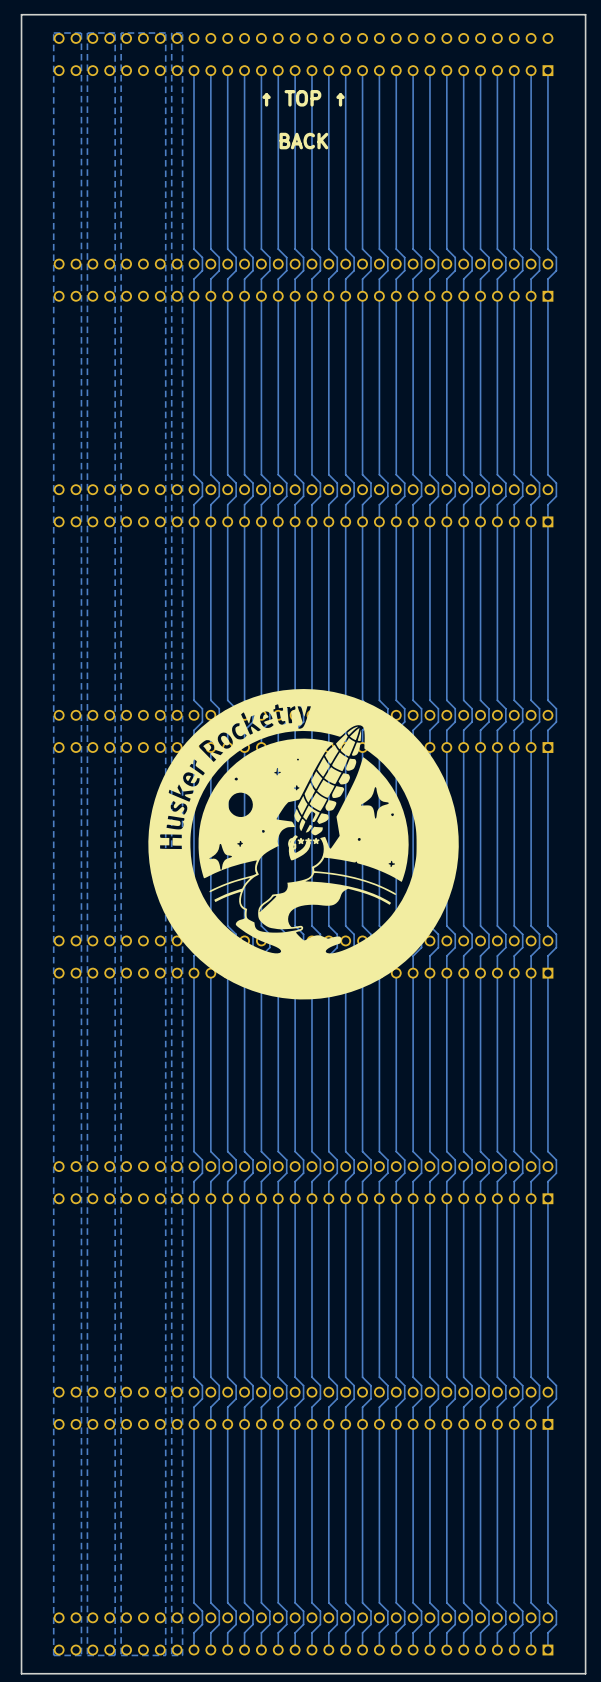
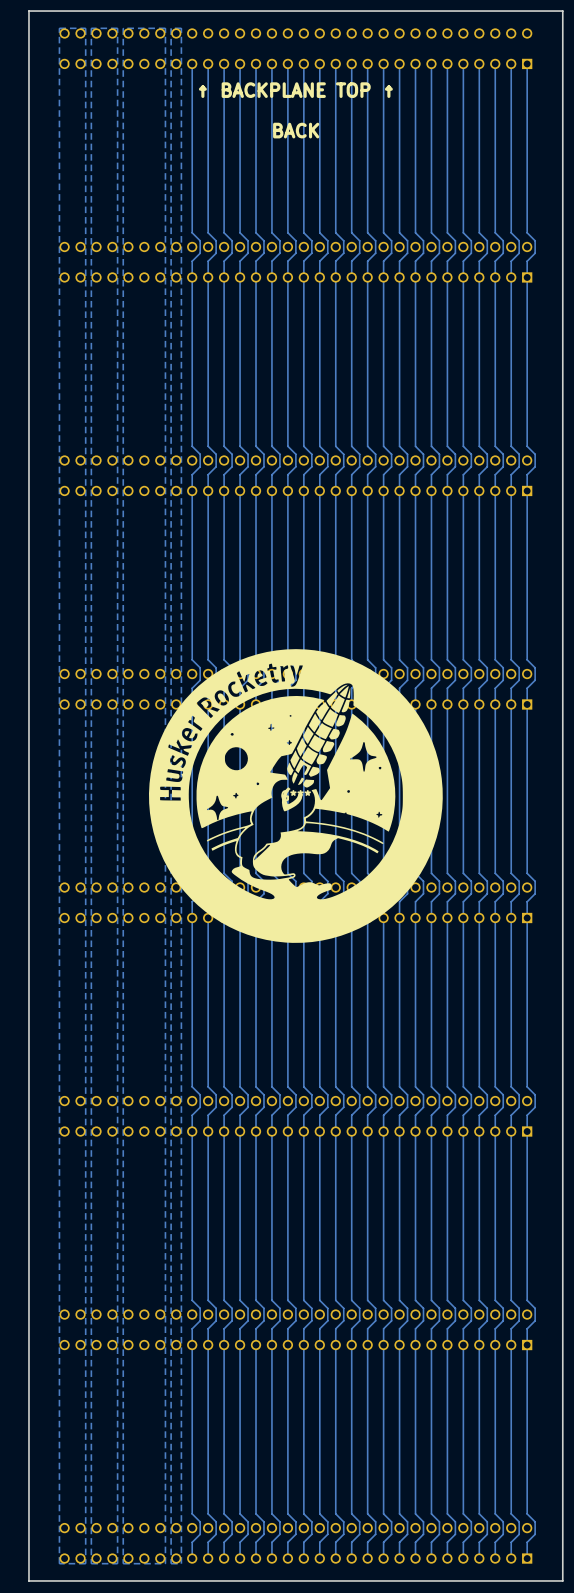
text: ↑ TOP ↑ (303, 98) -> ↑ BACKPLANE TOP ↑ (295, 90)

